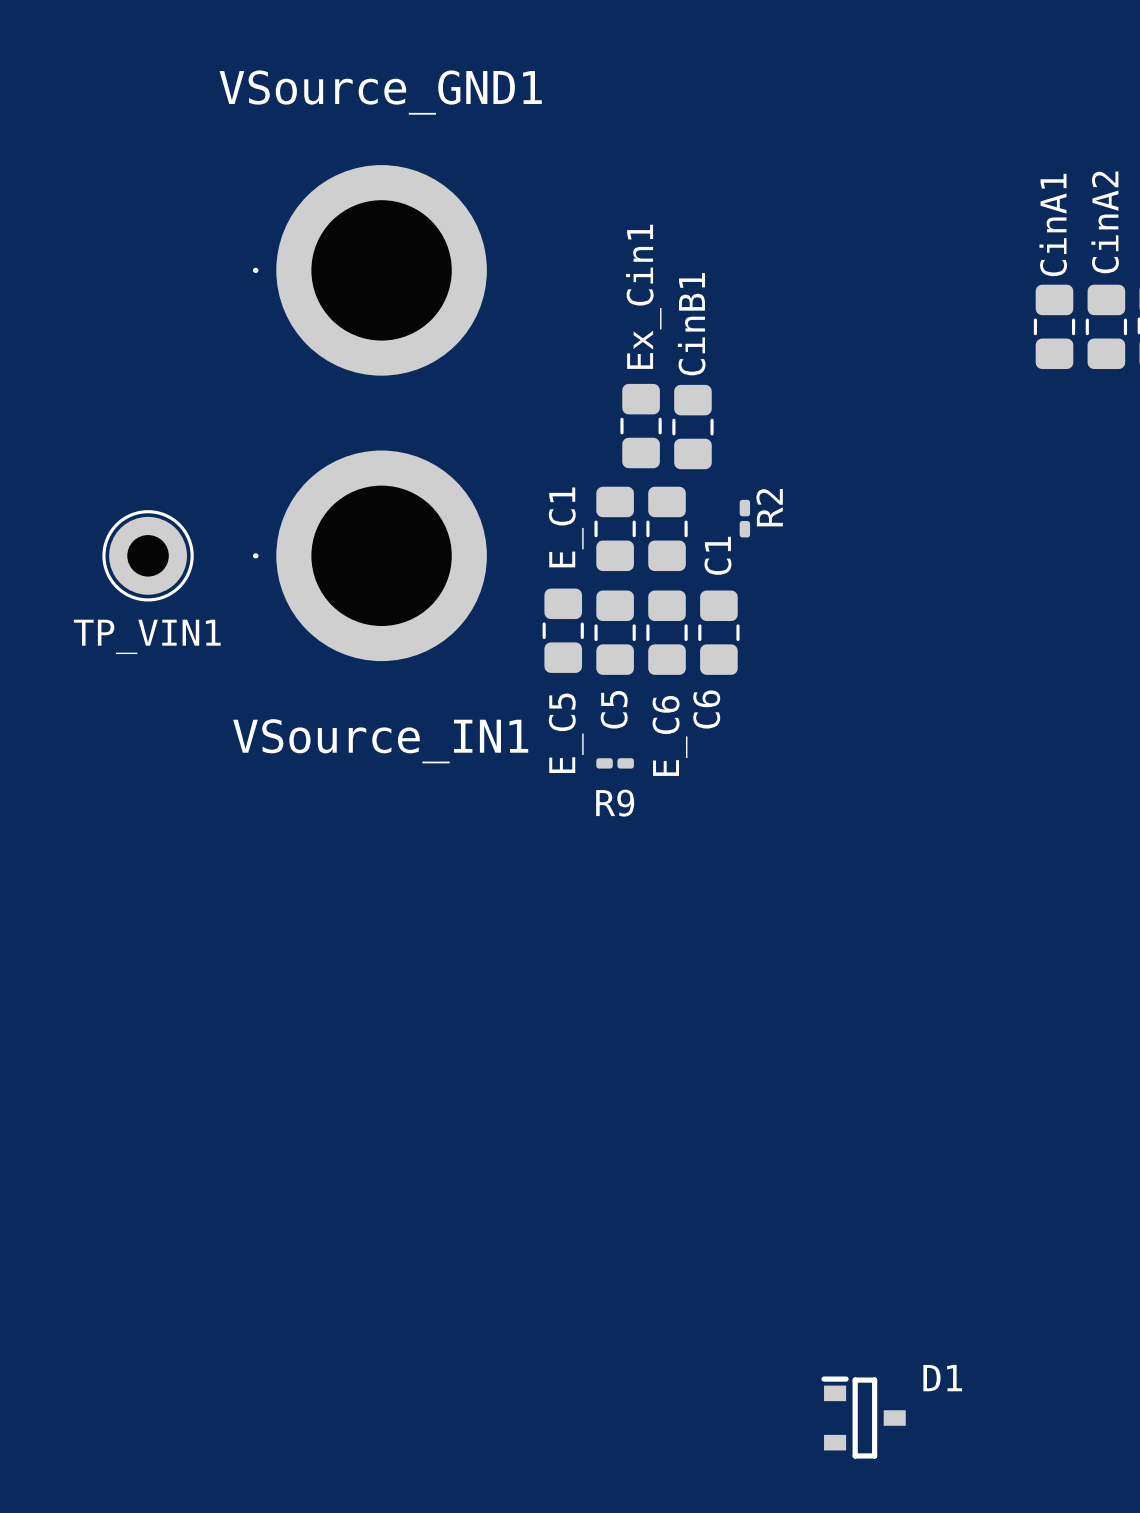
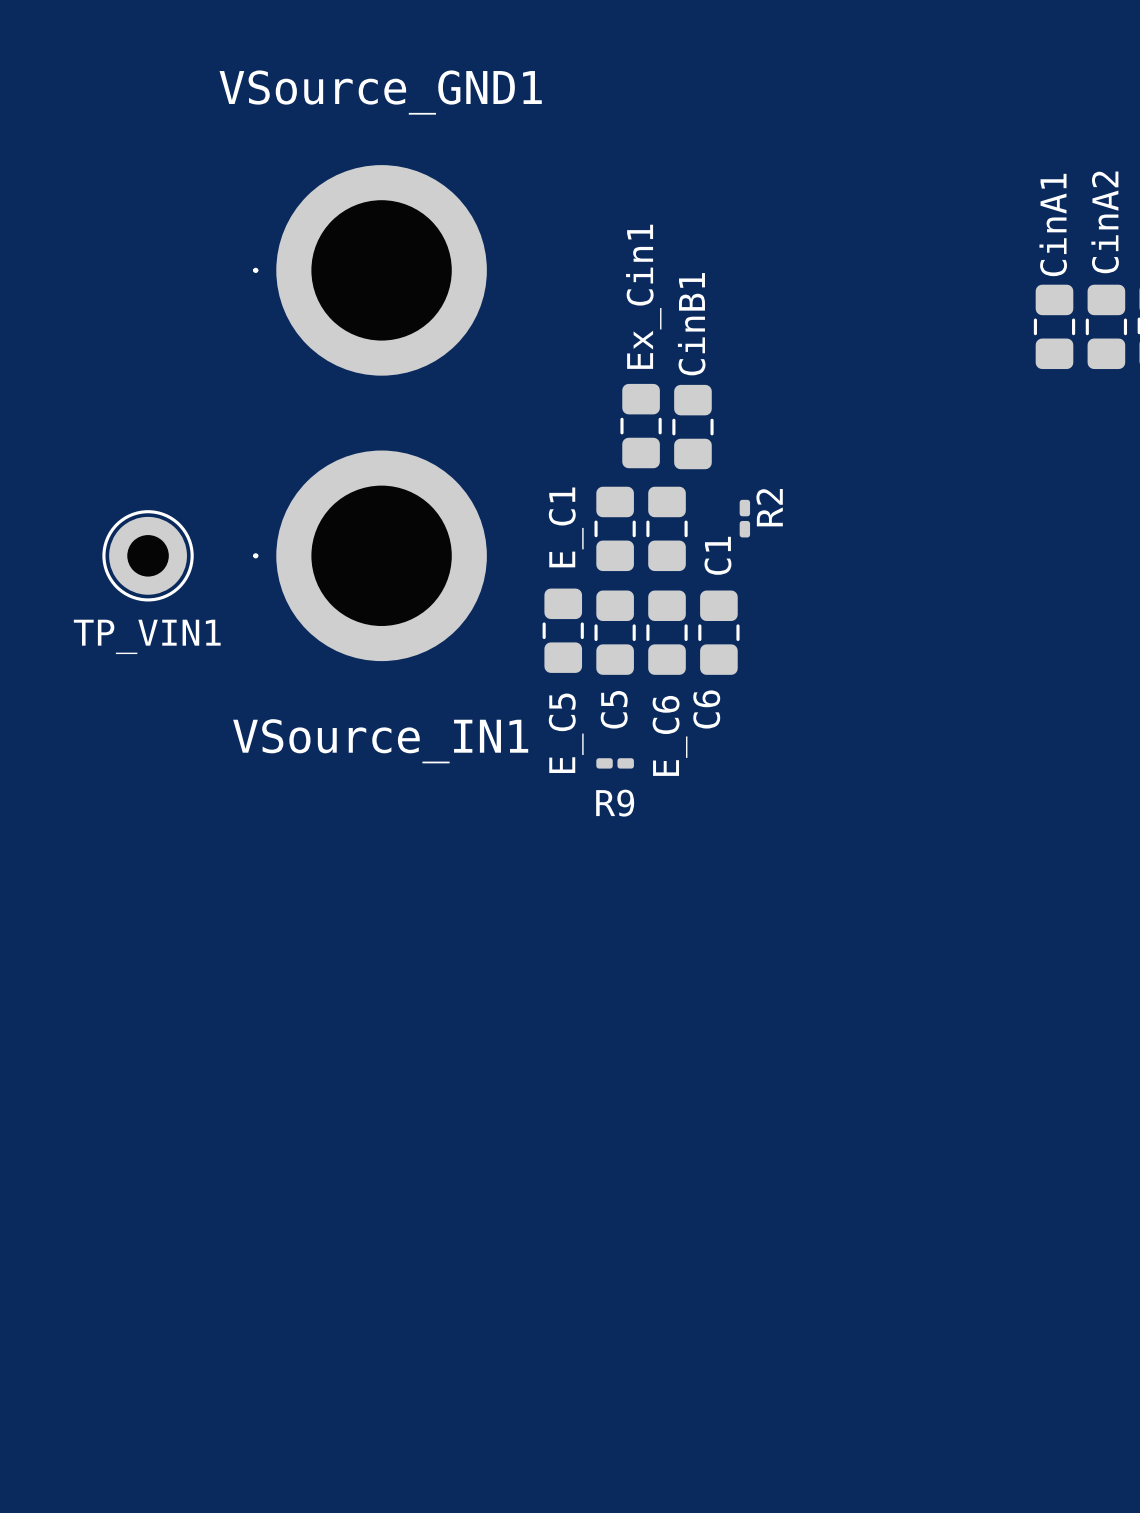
D1: (863, 1417) -> none

